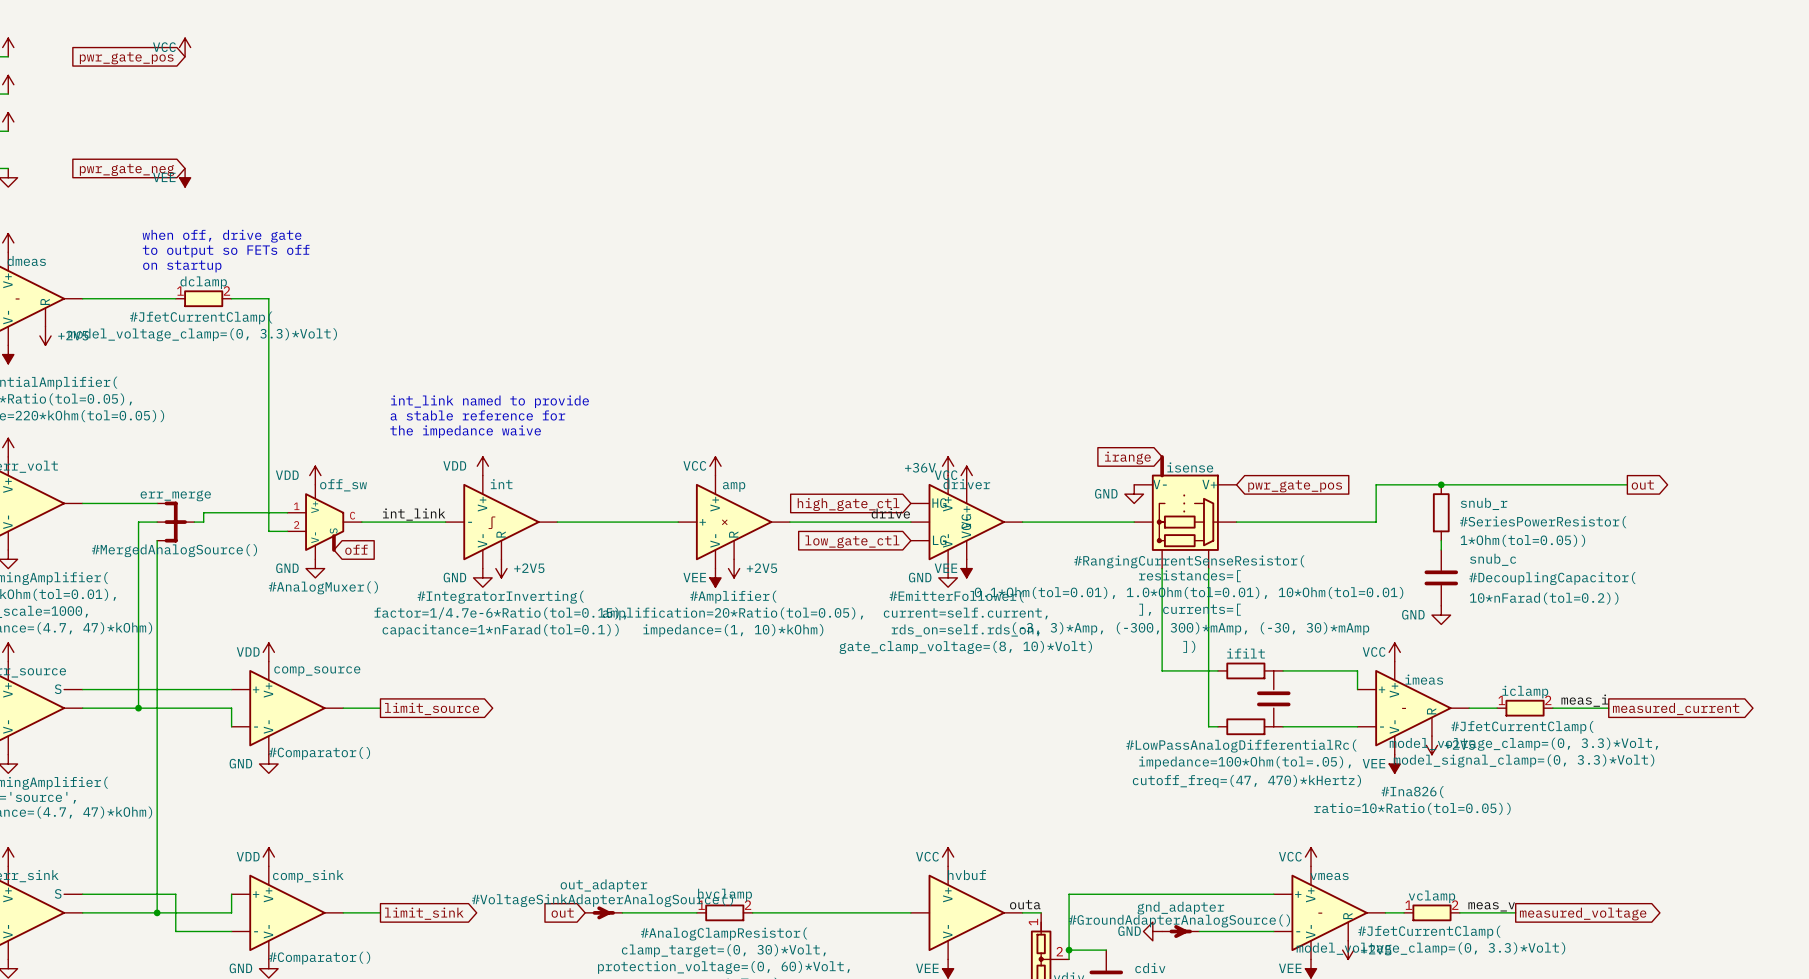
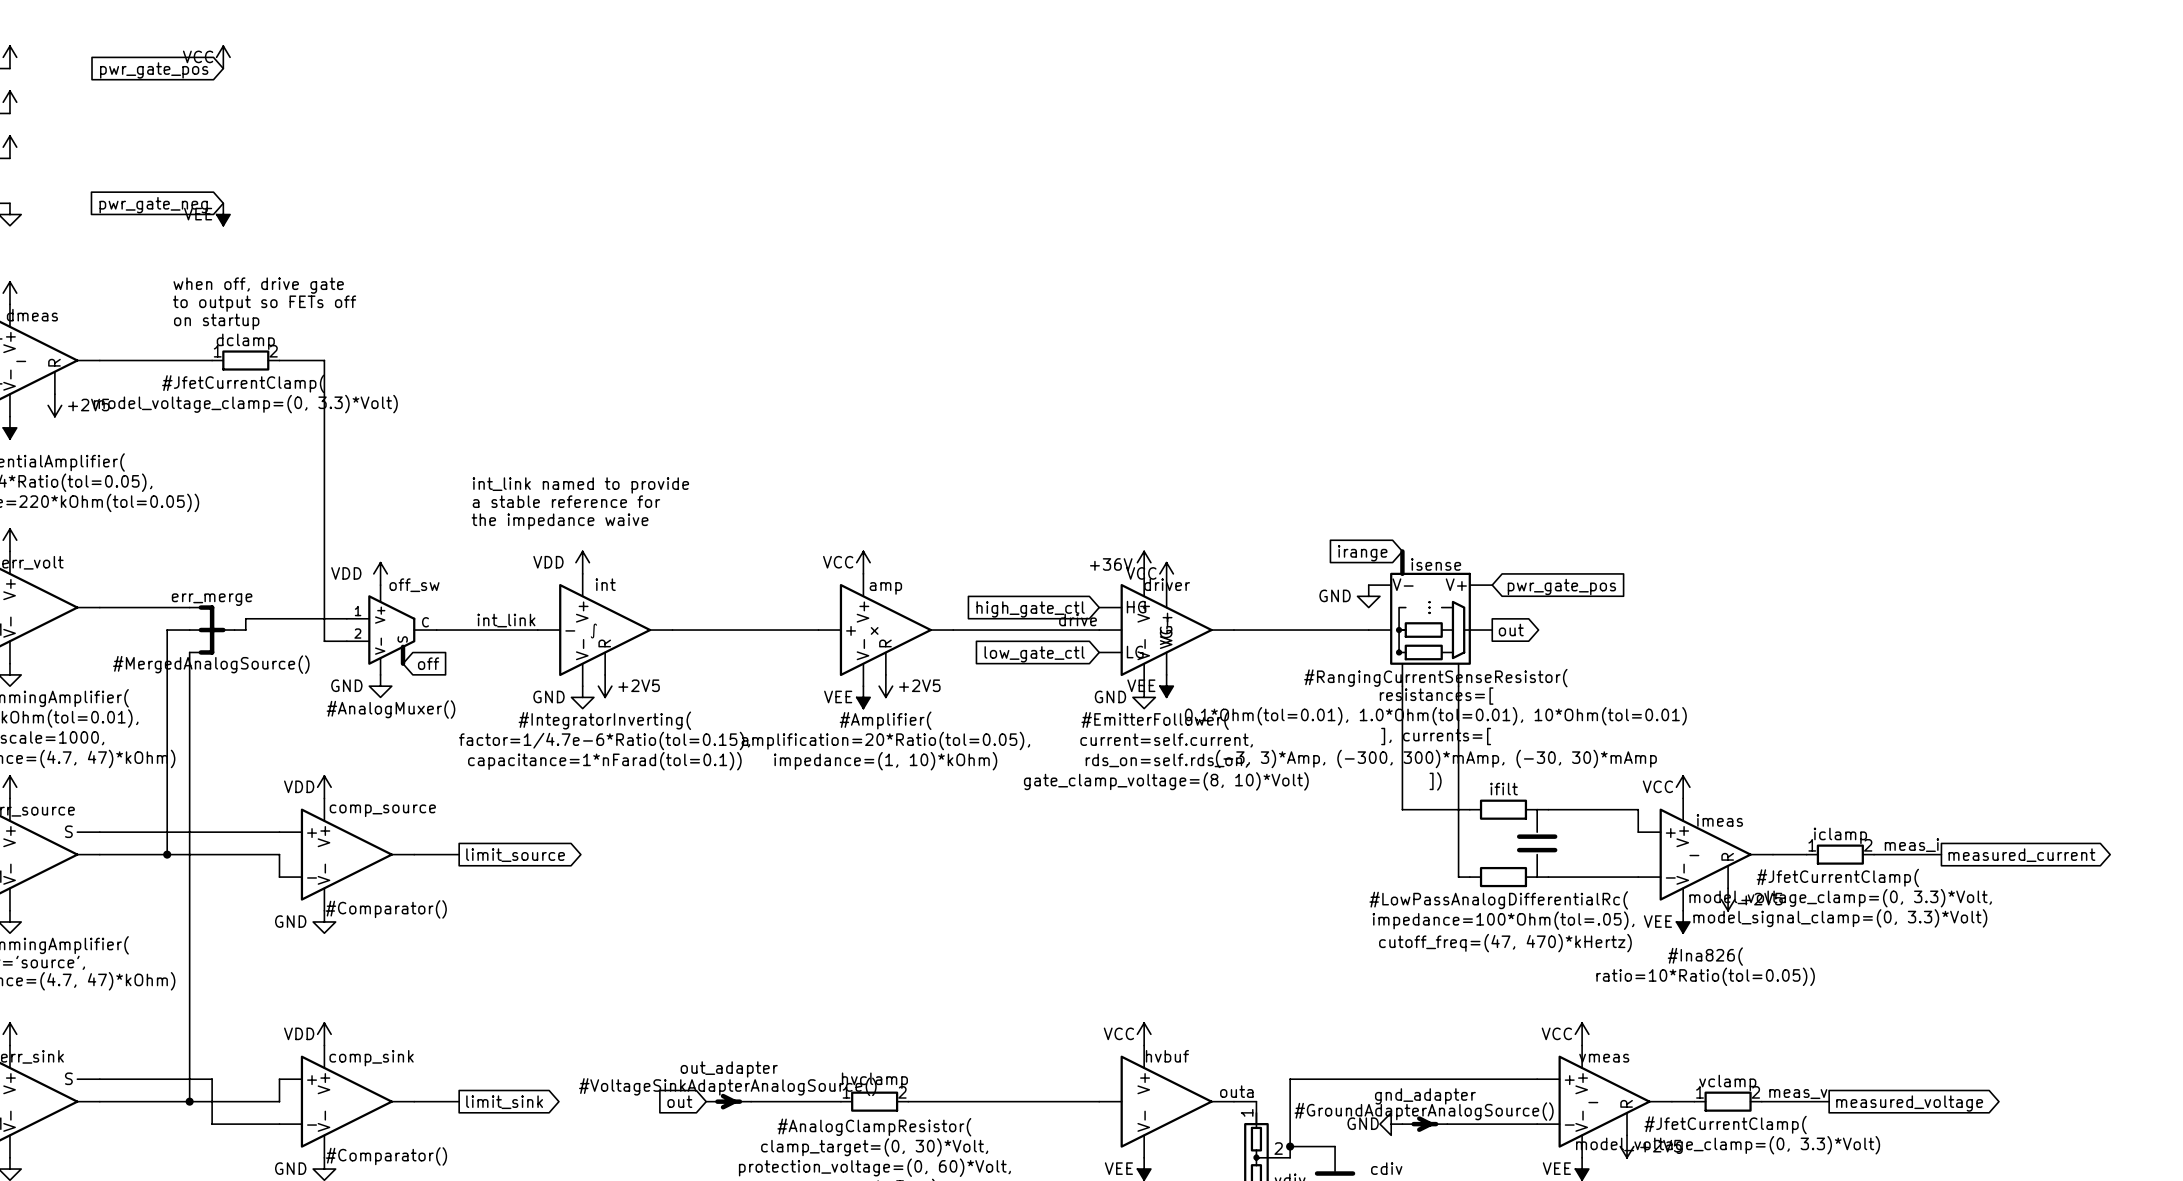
junction: (1441, 484) -> none
wire: (1627, 484) (1376, 484) (1376, 522) (1236, 522) -> none
global label: out (1642, 484) -> none
snub_r: #SeriesPowerResistor( (1441, 512) -> none
global label: none -> out (1511, 630)
wire: (1441, 540) (1441, 549) -> none
snub_c: #DecouplingCapacitor( (1441, 577) -> none
power symbol: GND (1441, 615) -> none

